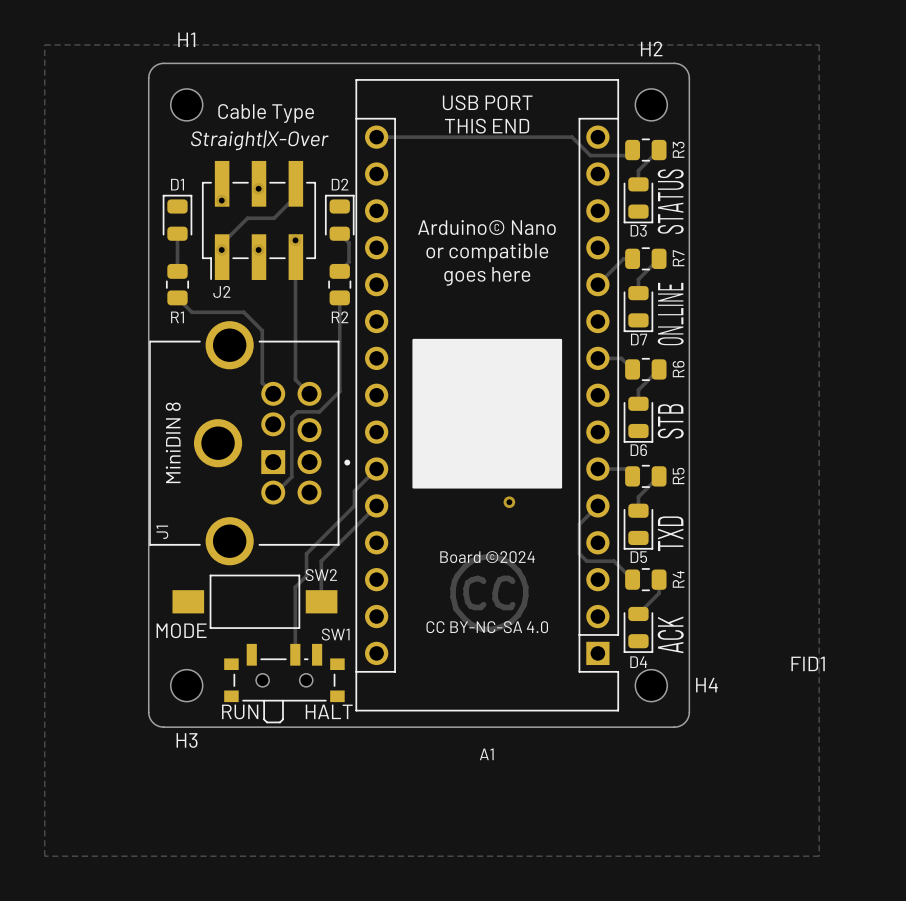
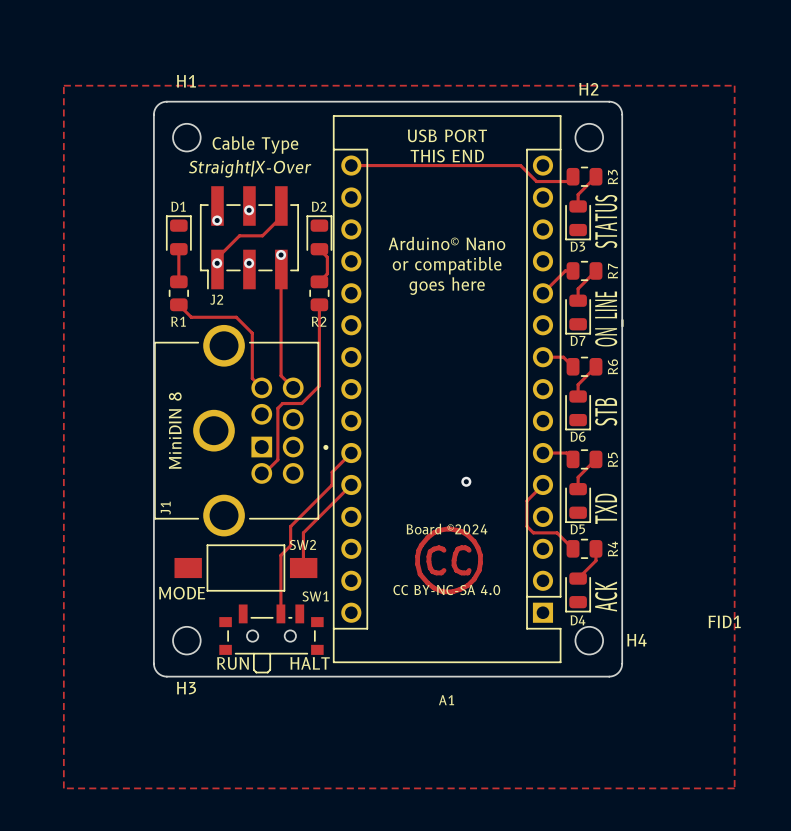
drawing: [412, 338, 563, 489] -> none

